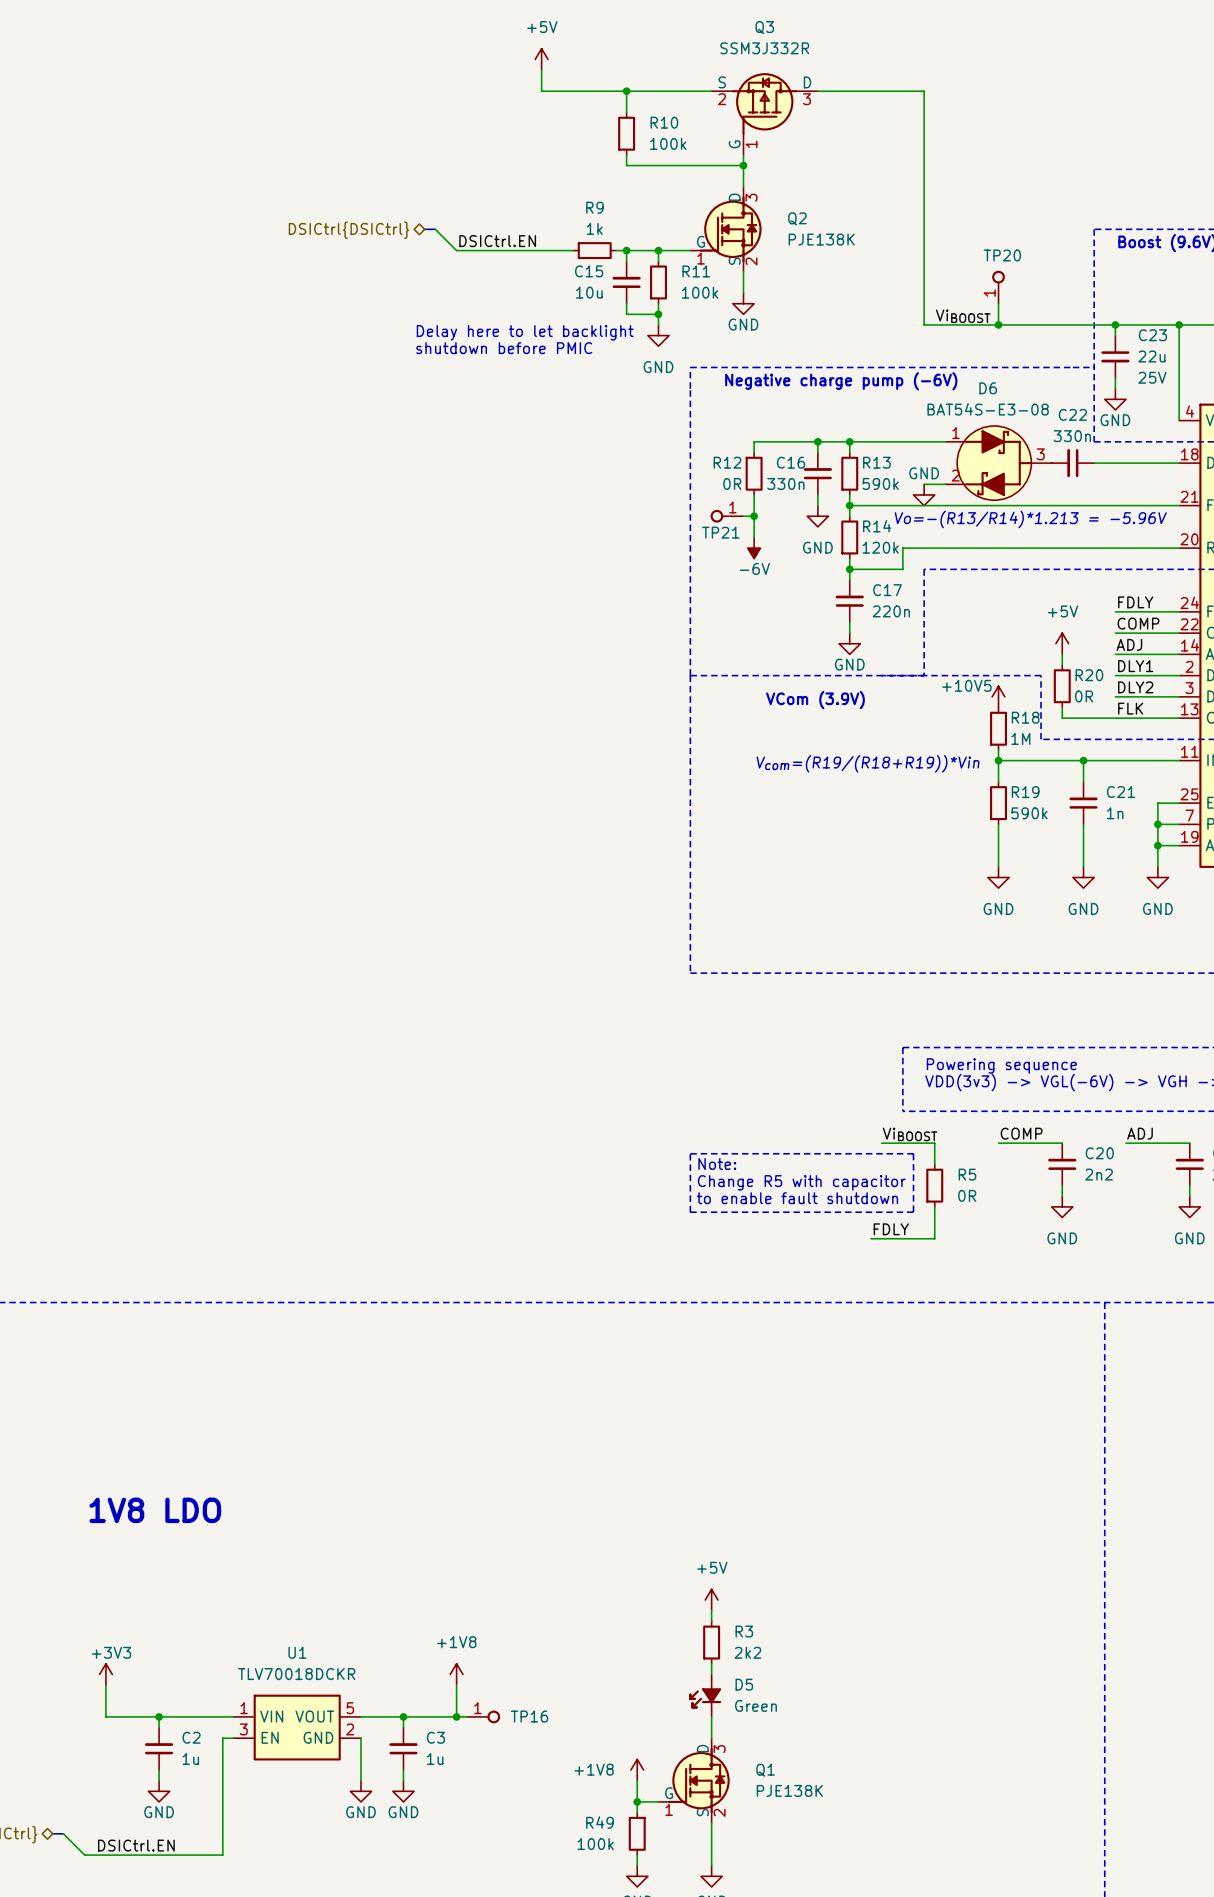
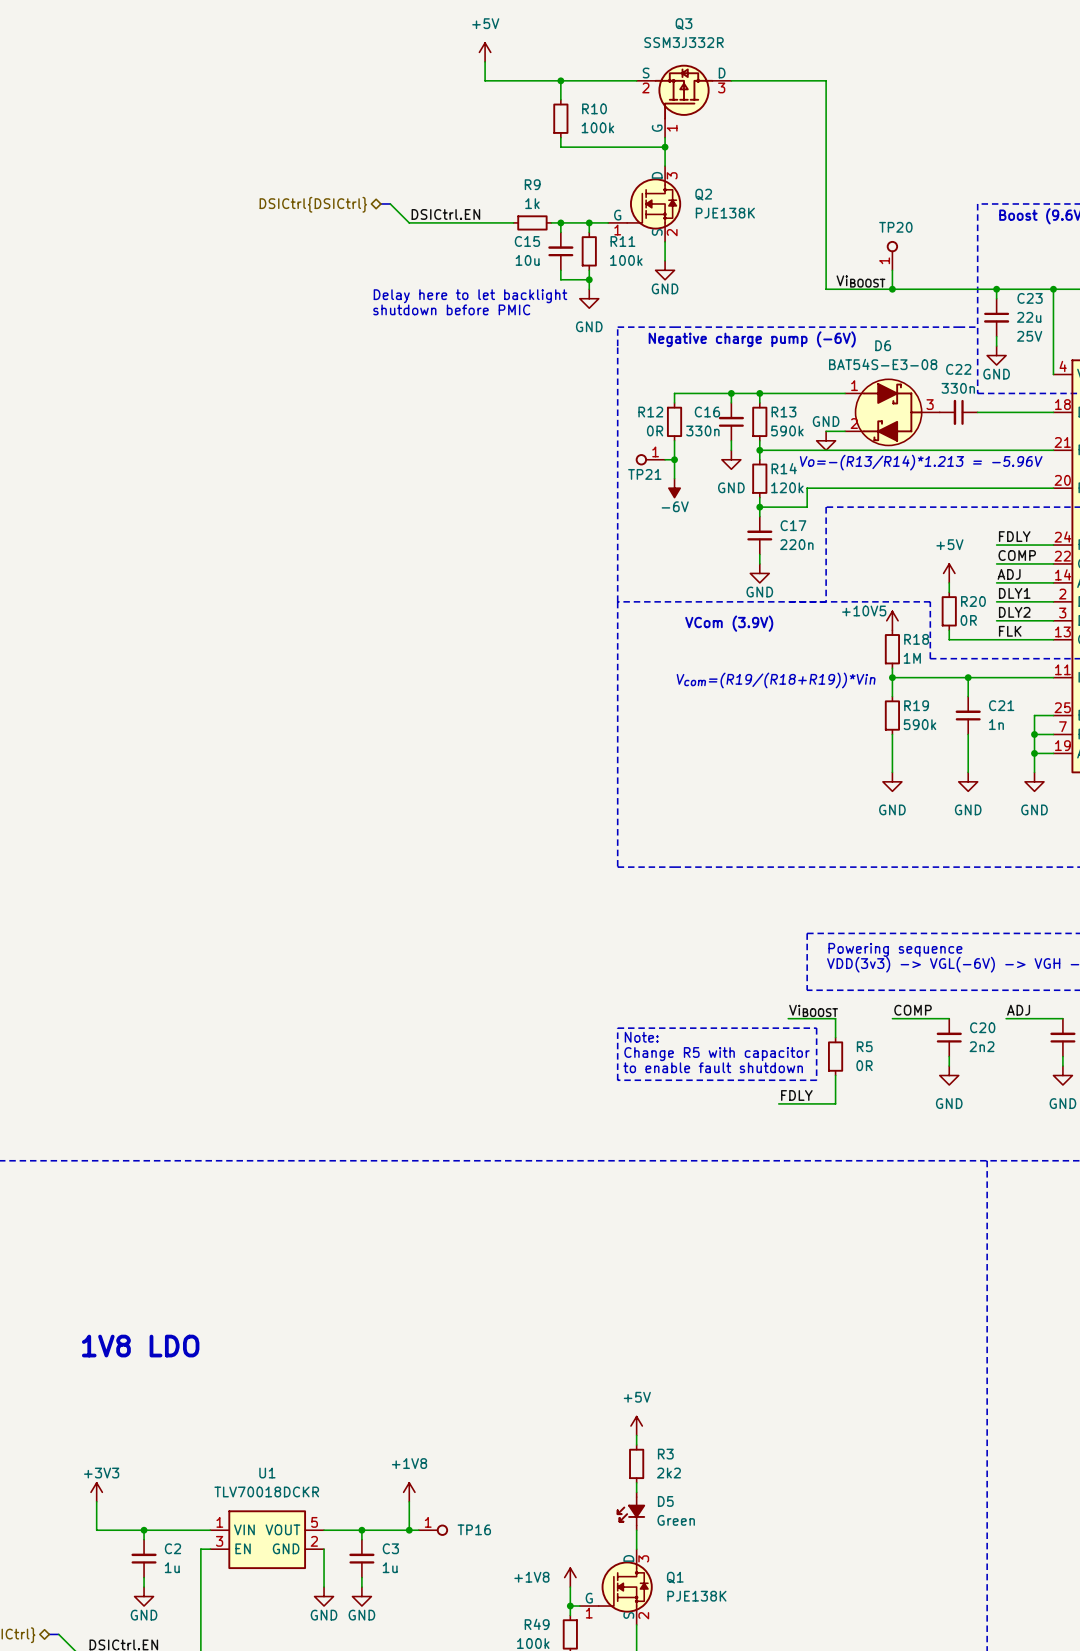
Q2 symbol: [690, 186, 762, 272] -> [608, 166, 682, 242]
Q1 symbol: [658, 1738, 730, 1824] -> [579, 1549, 653, 1625]

